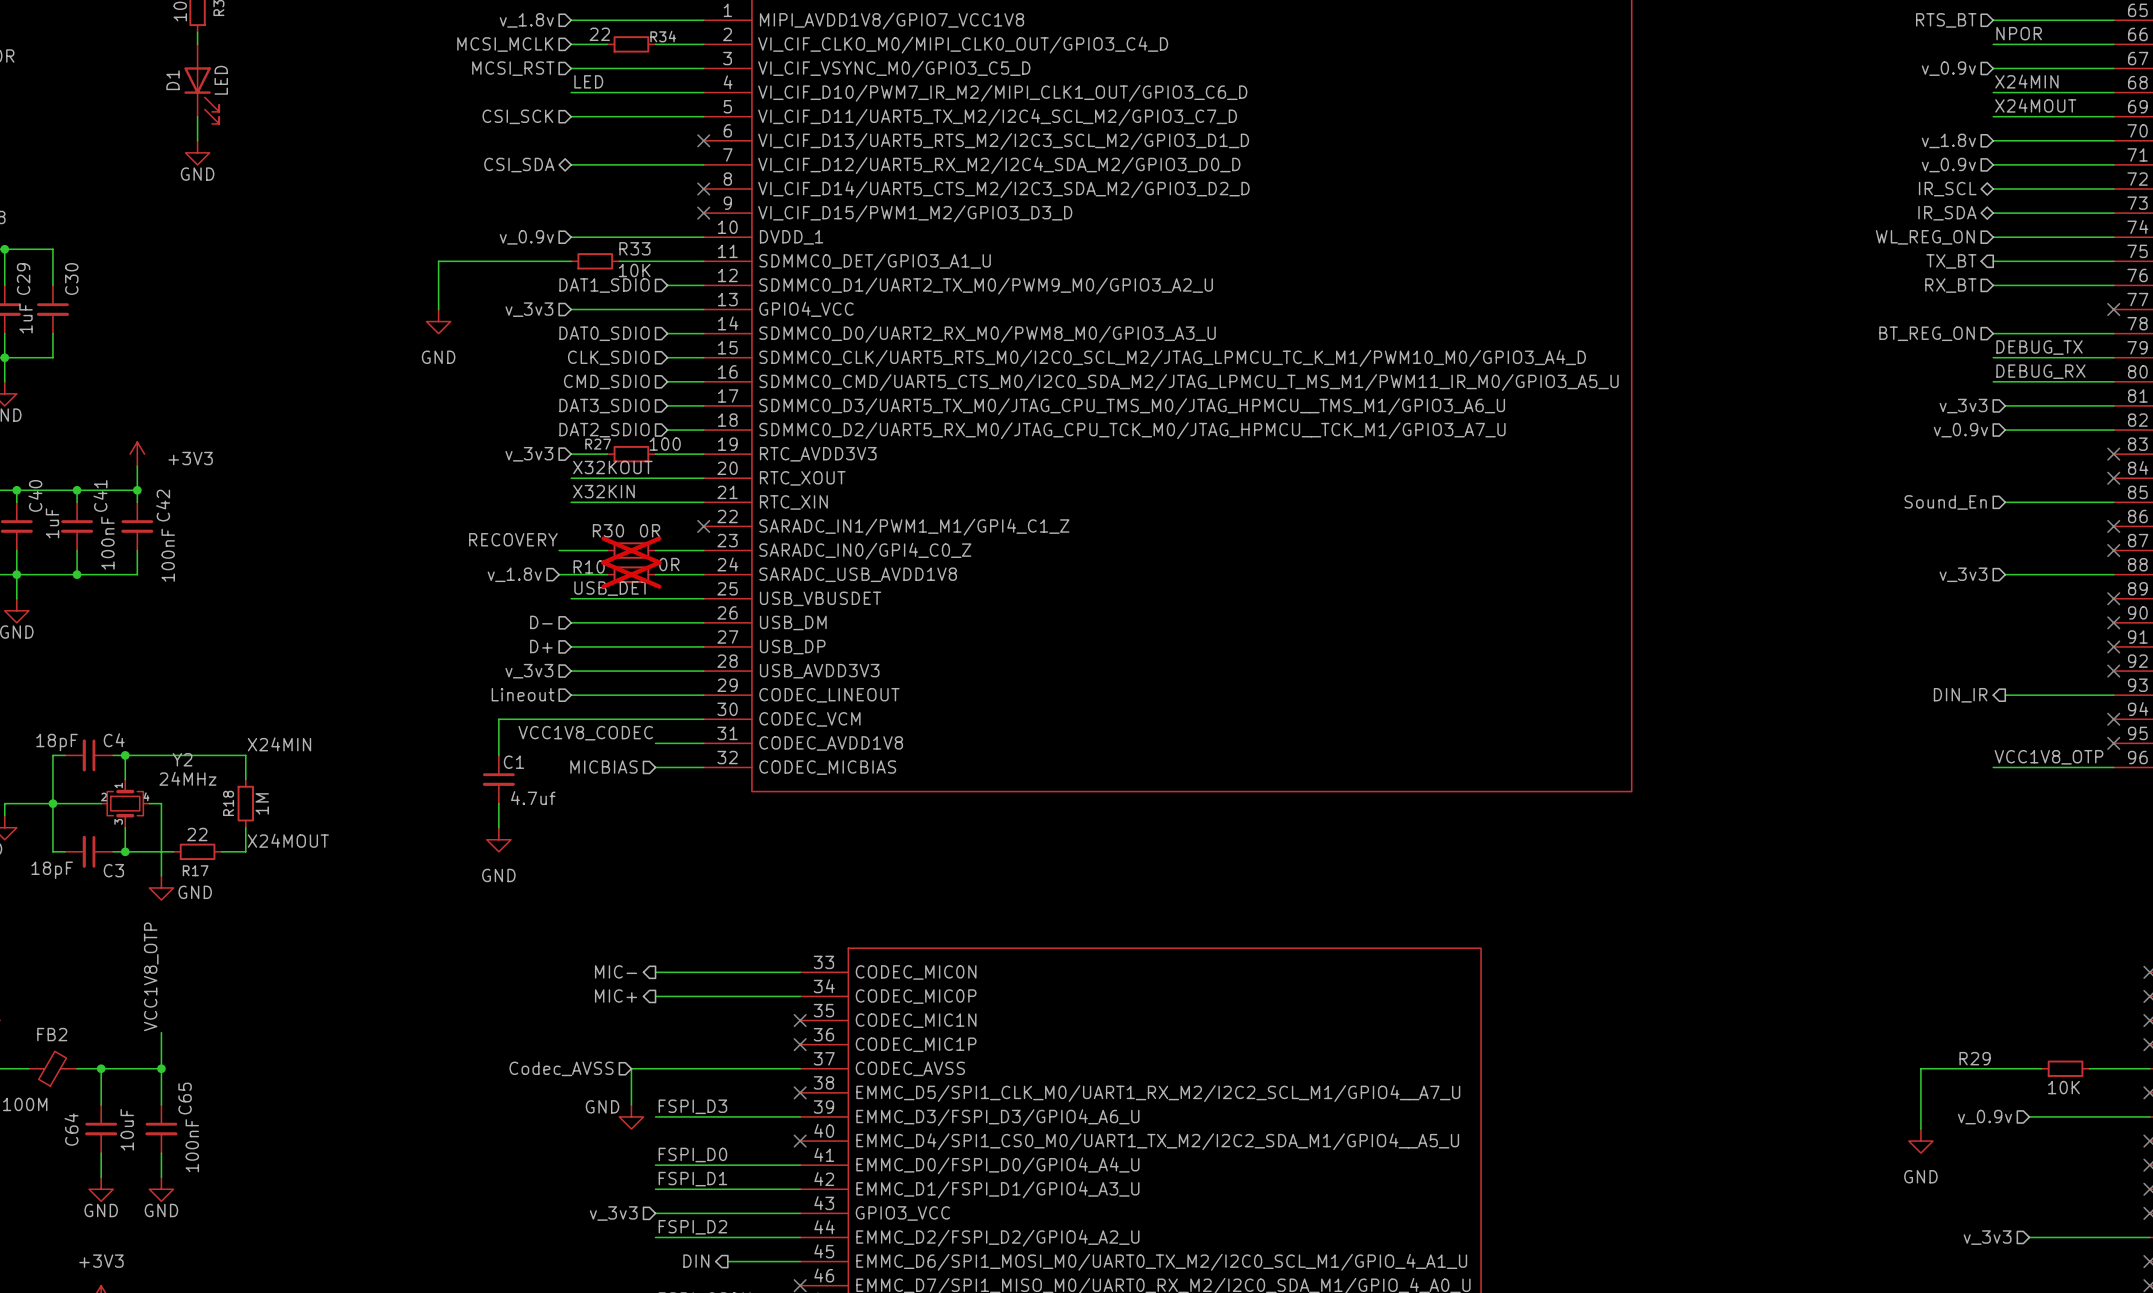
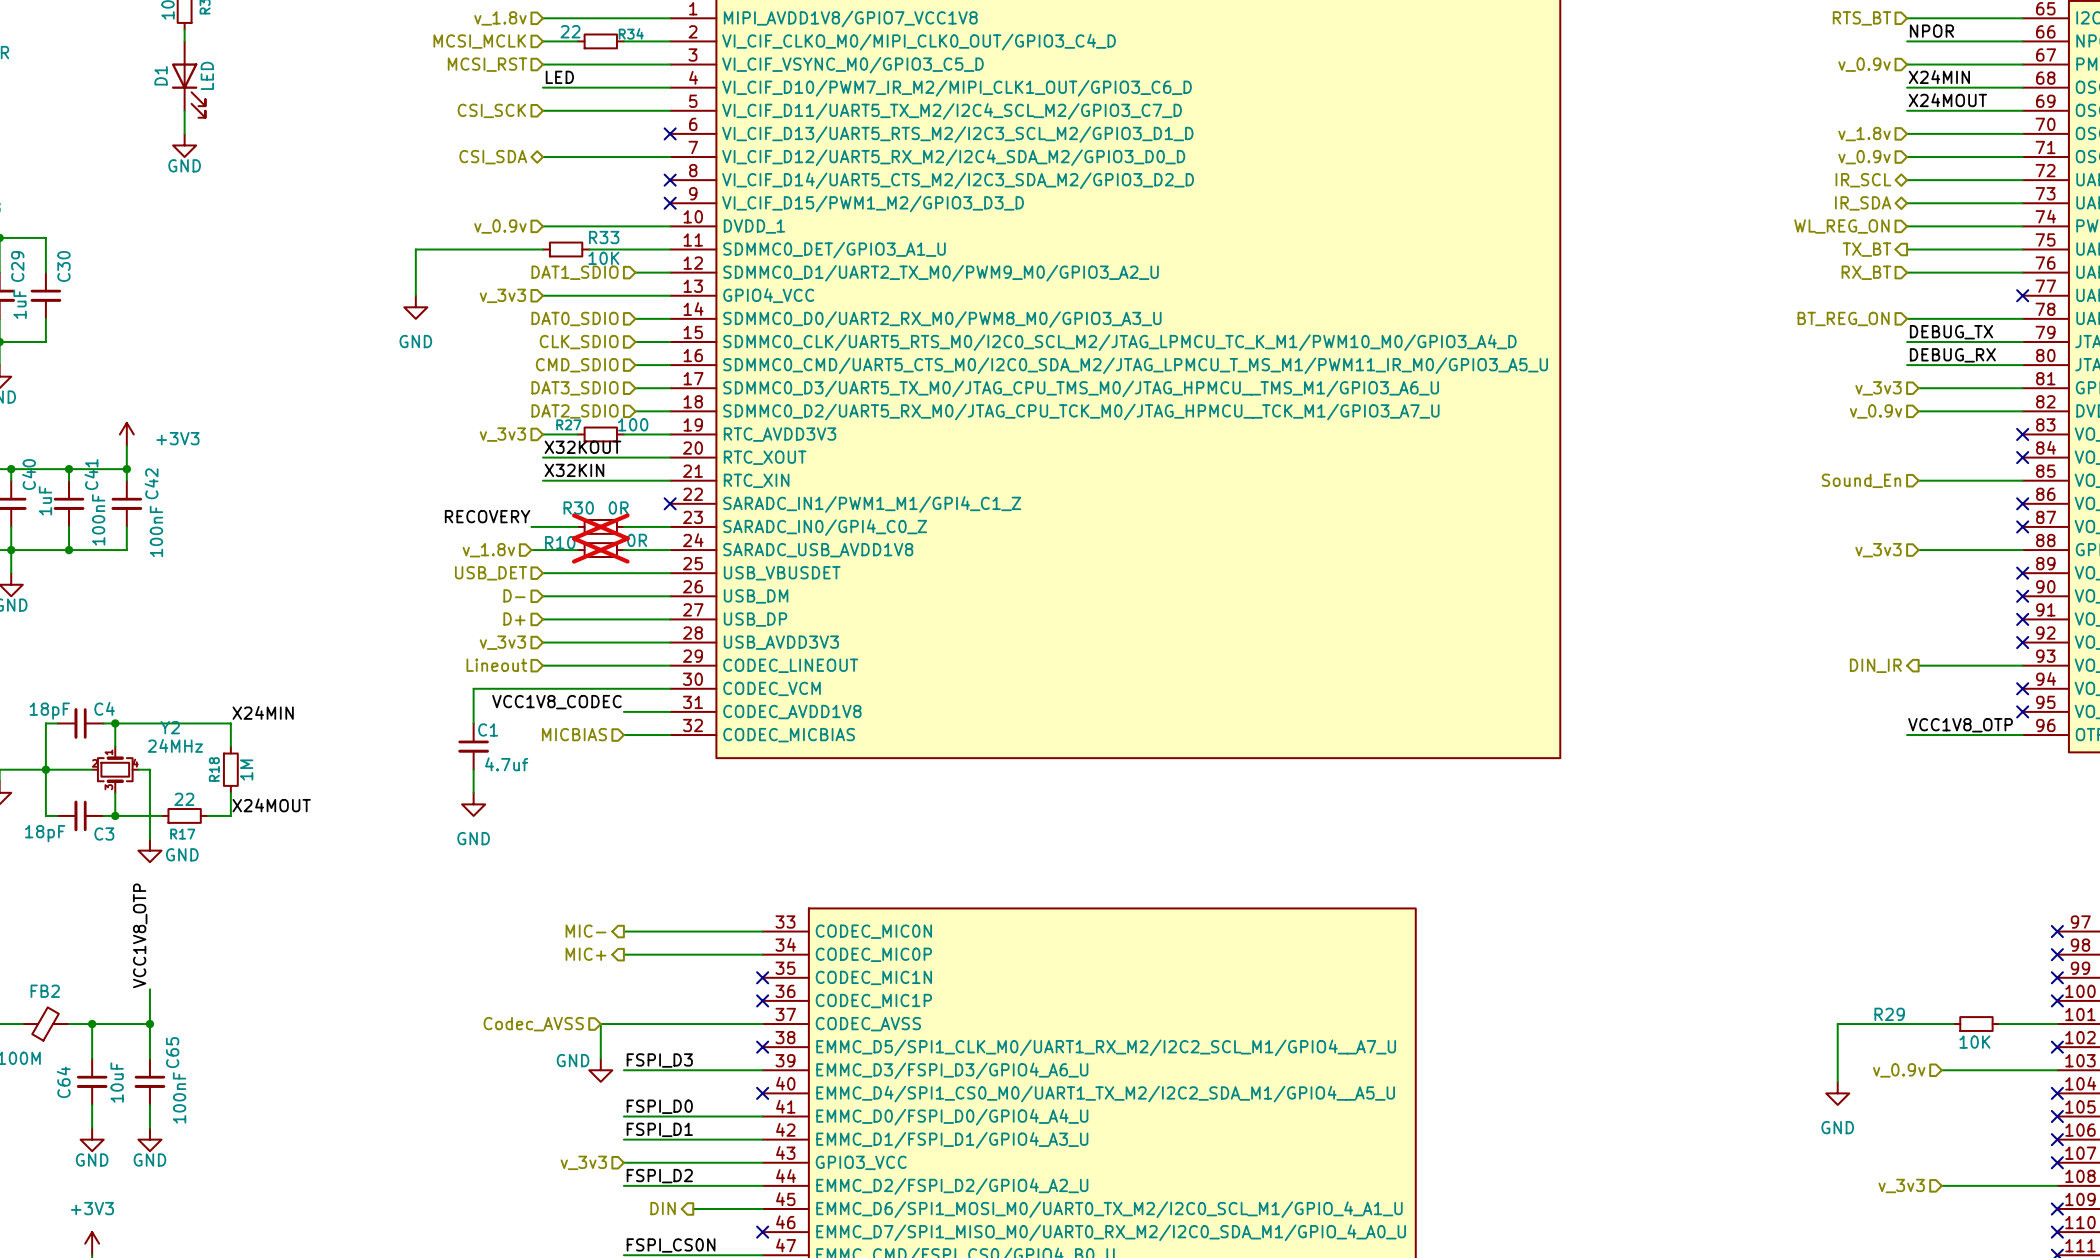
label: USB_DET (611, 588) -> none
hierarchical label: none -> USB_DET (491, 573)

